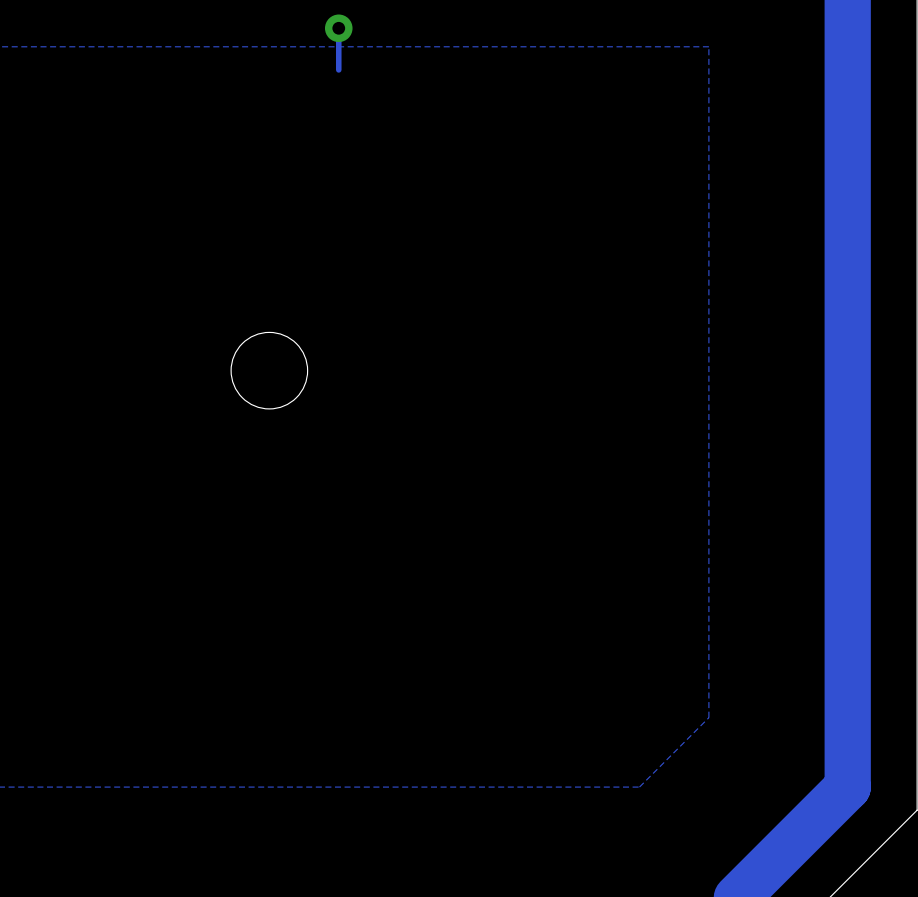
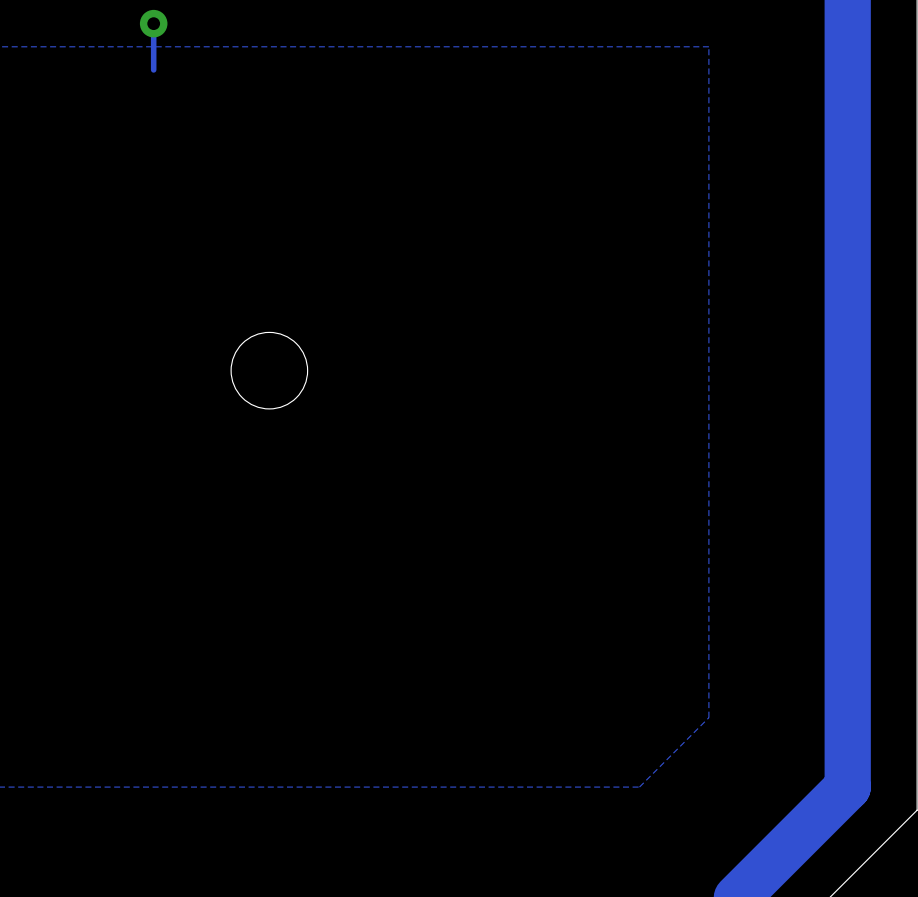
track: none -> (153, 23) (153, 69)
via: none -> (153, 23)
track: (338, 28) (338, 69) -> none
via: (338, 28) -> none

